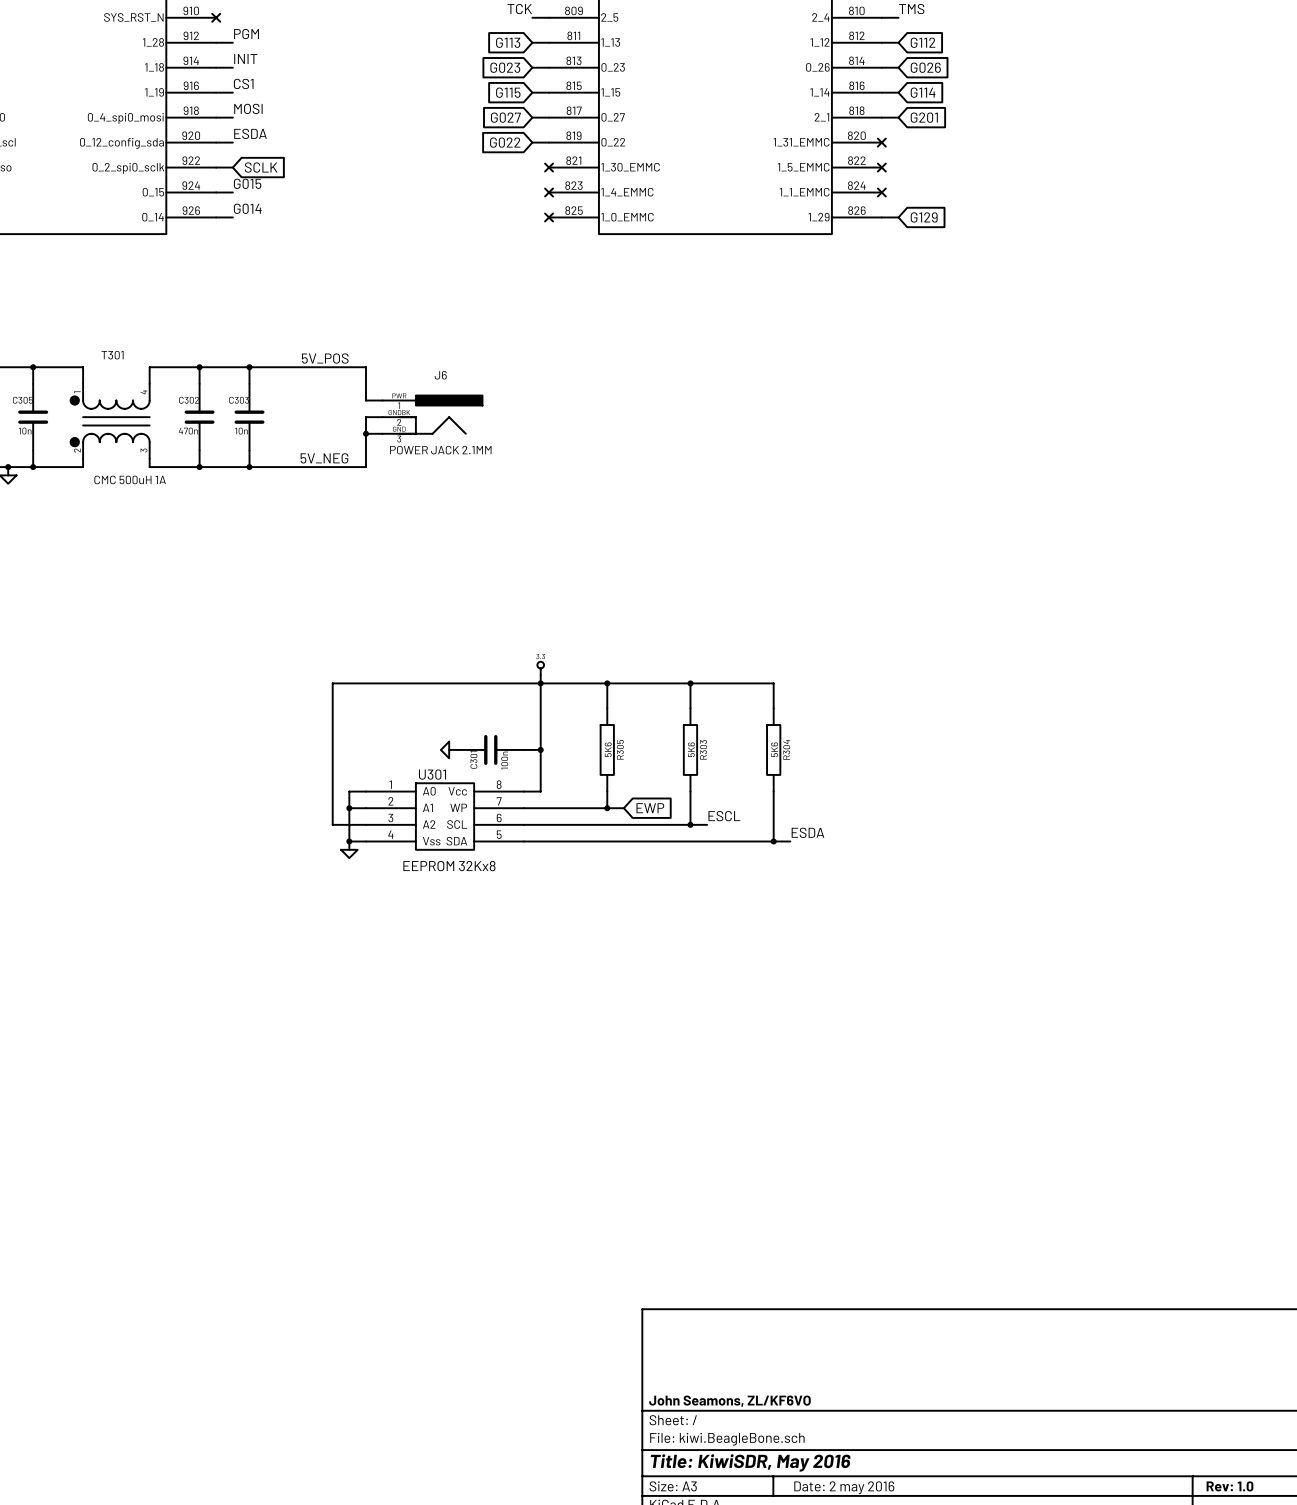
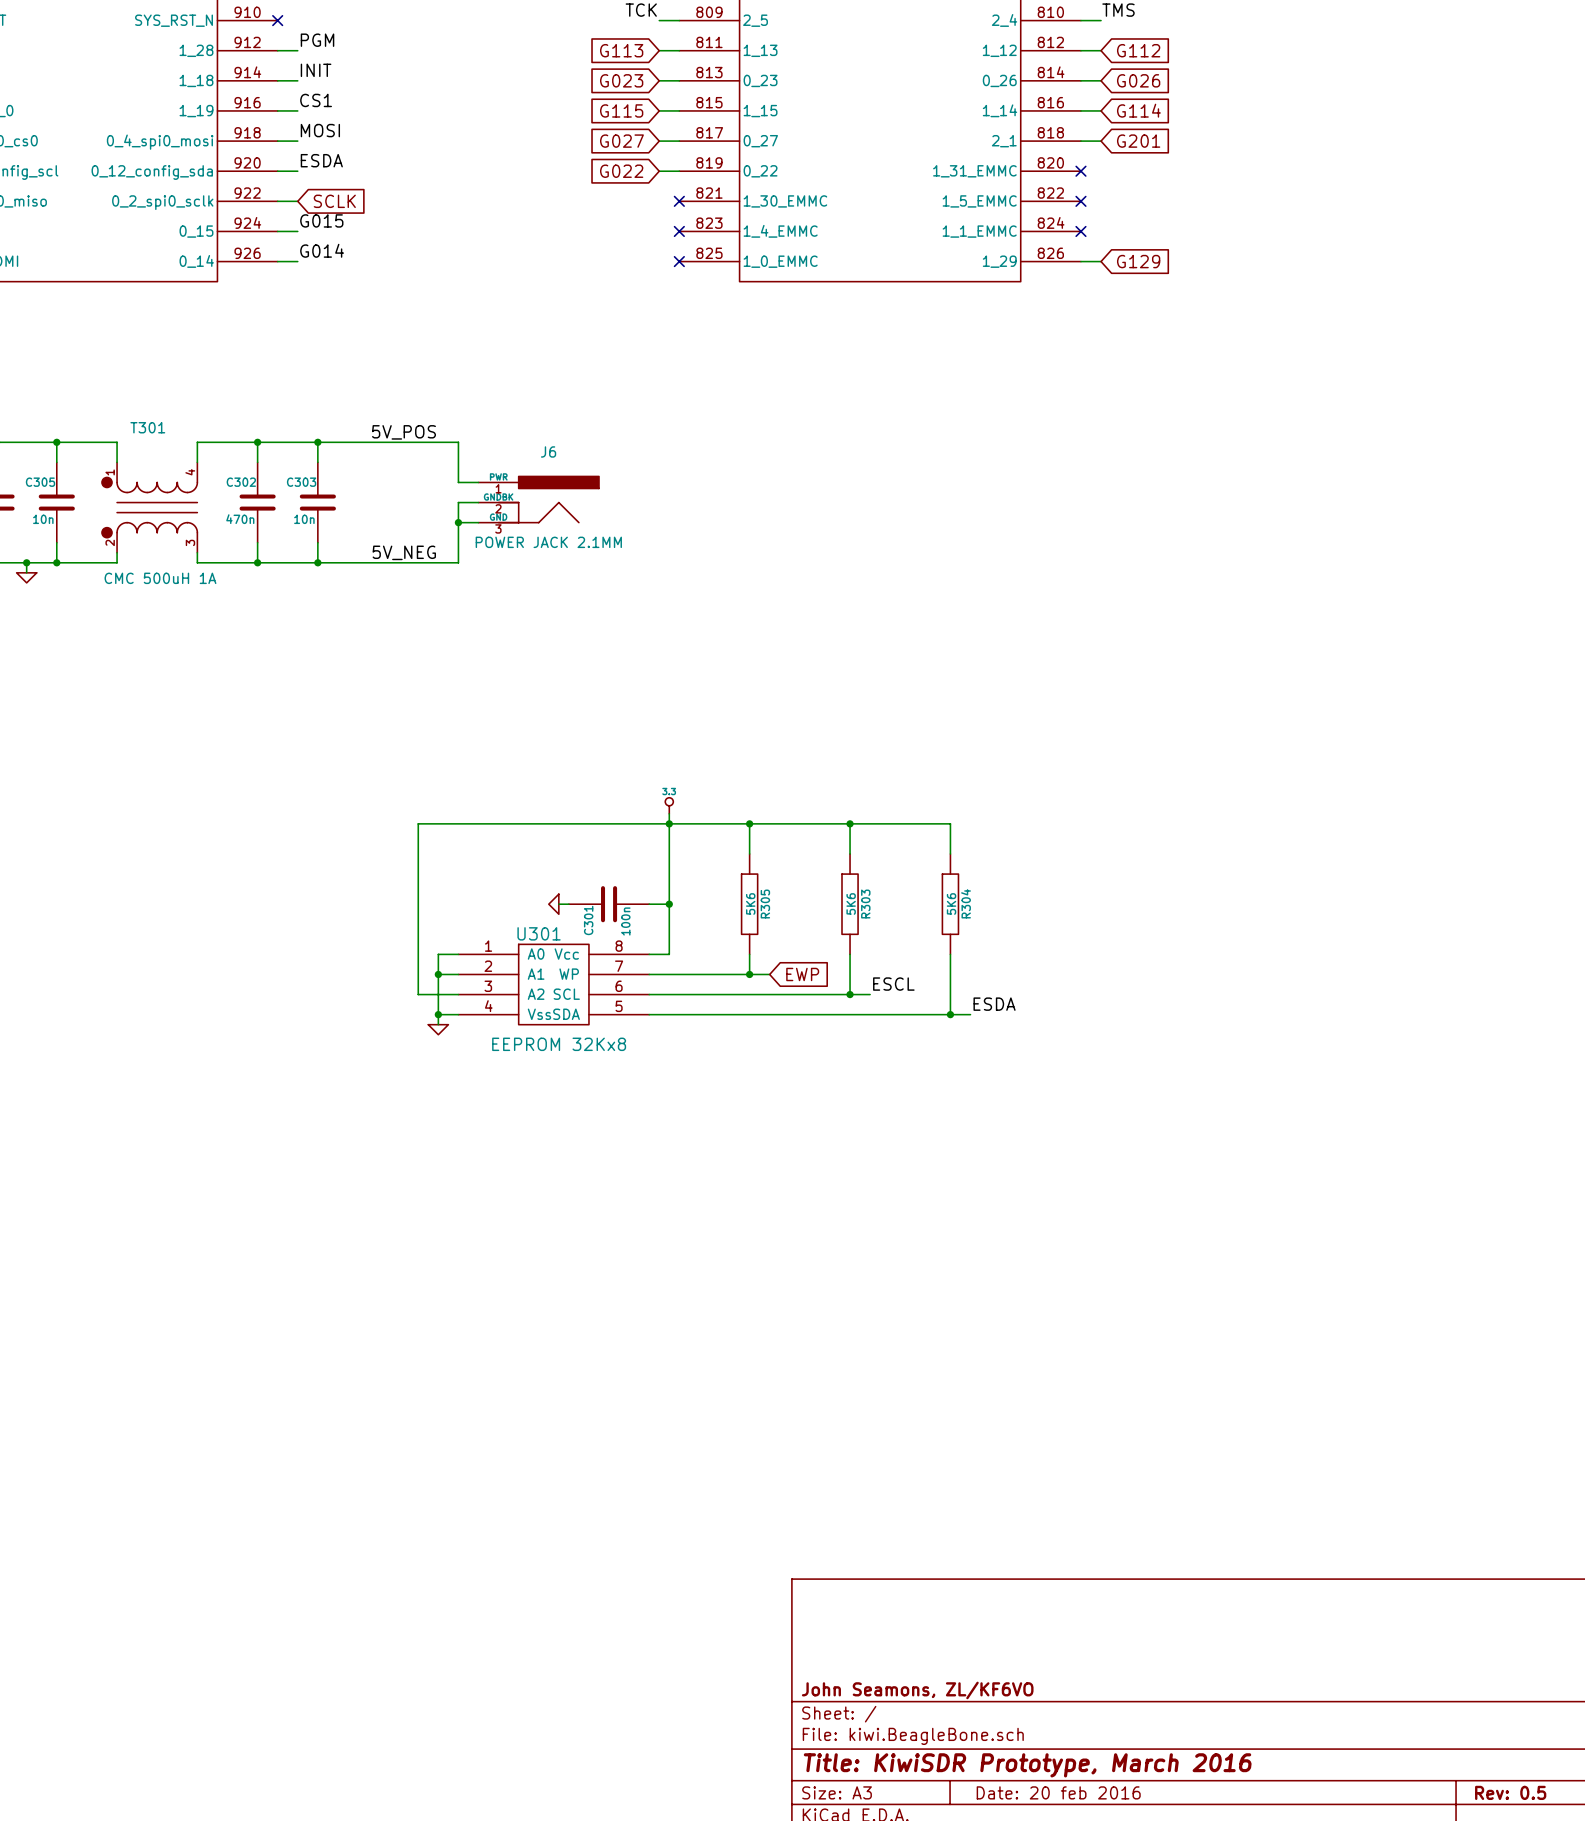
title block: Title: KiwiSDR, May 2016 (750, 1462) -> Title: KiwiSDR Prototype, March 2016 (1027, 1765)
title block: Rev: 1.0 (1229, 1486) -> Rev: 0.5 (1510, 1792)
title block: Date: 2 may 2016 (844, 1487) -> Date: 20 feb 2016 (1058, 1792)

